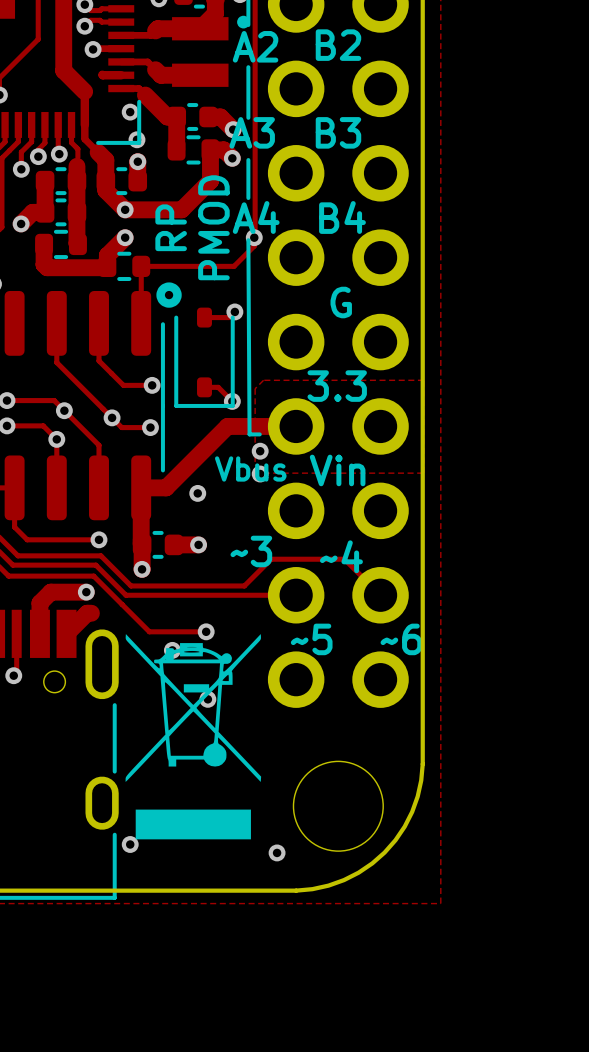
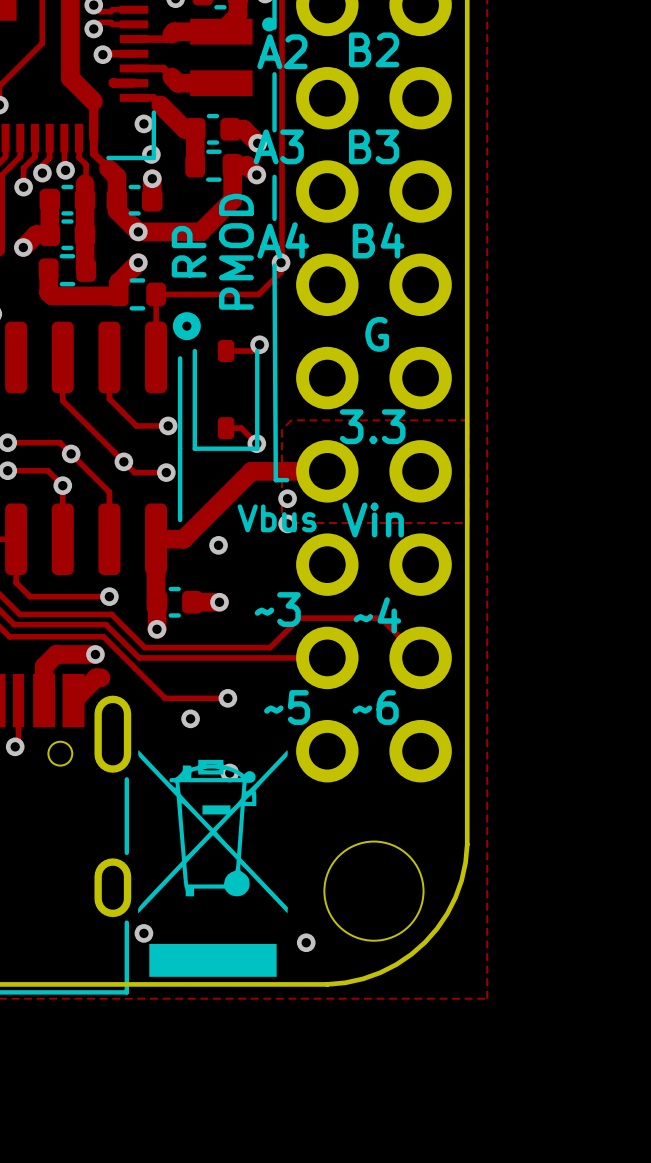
text position: ~5 (311, 639) -> ~5 (287, 707)
text position: ~6 (401, 639) -> ~6 (375, 707)
drawing position: (193, 736) -> (213, 863)

